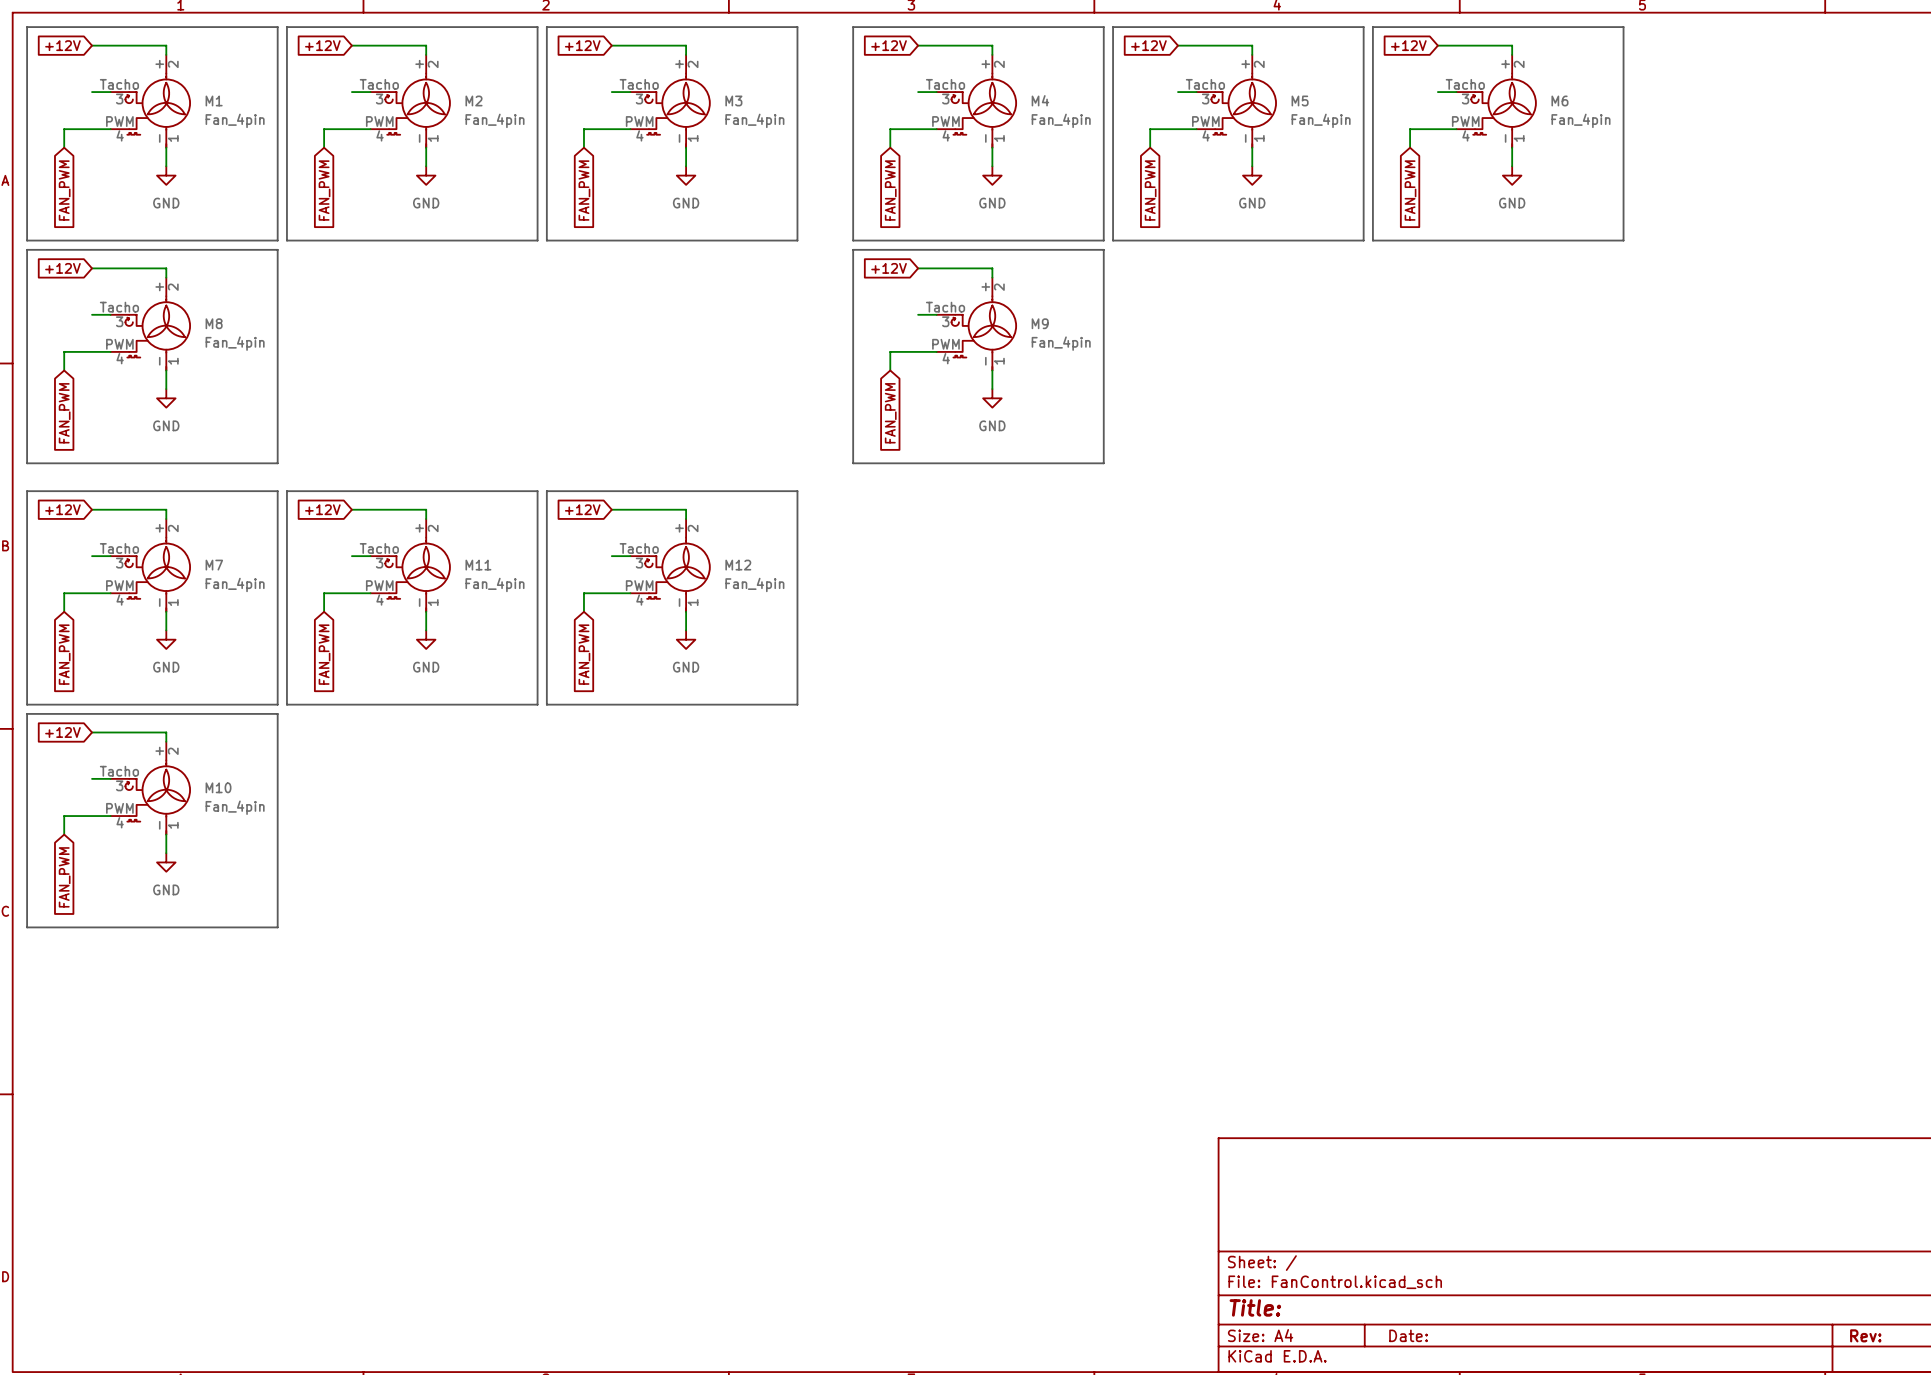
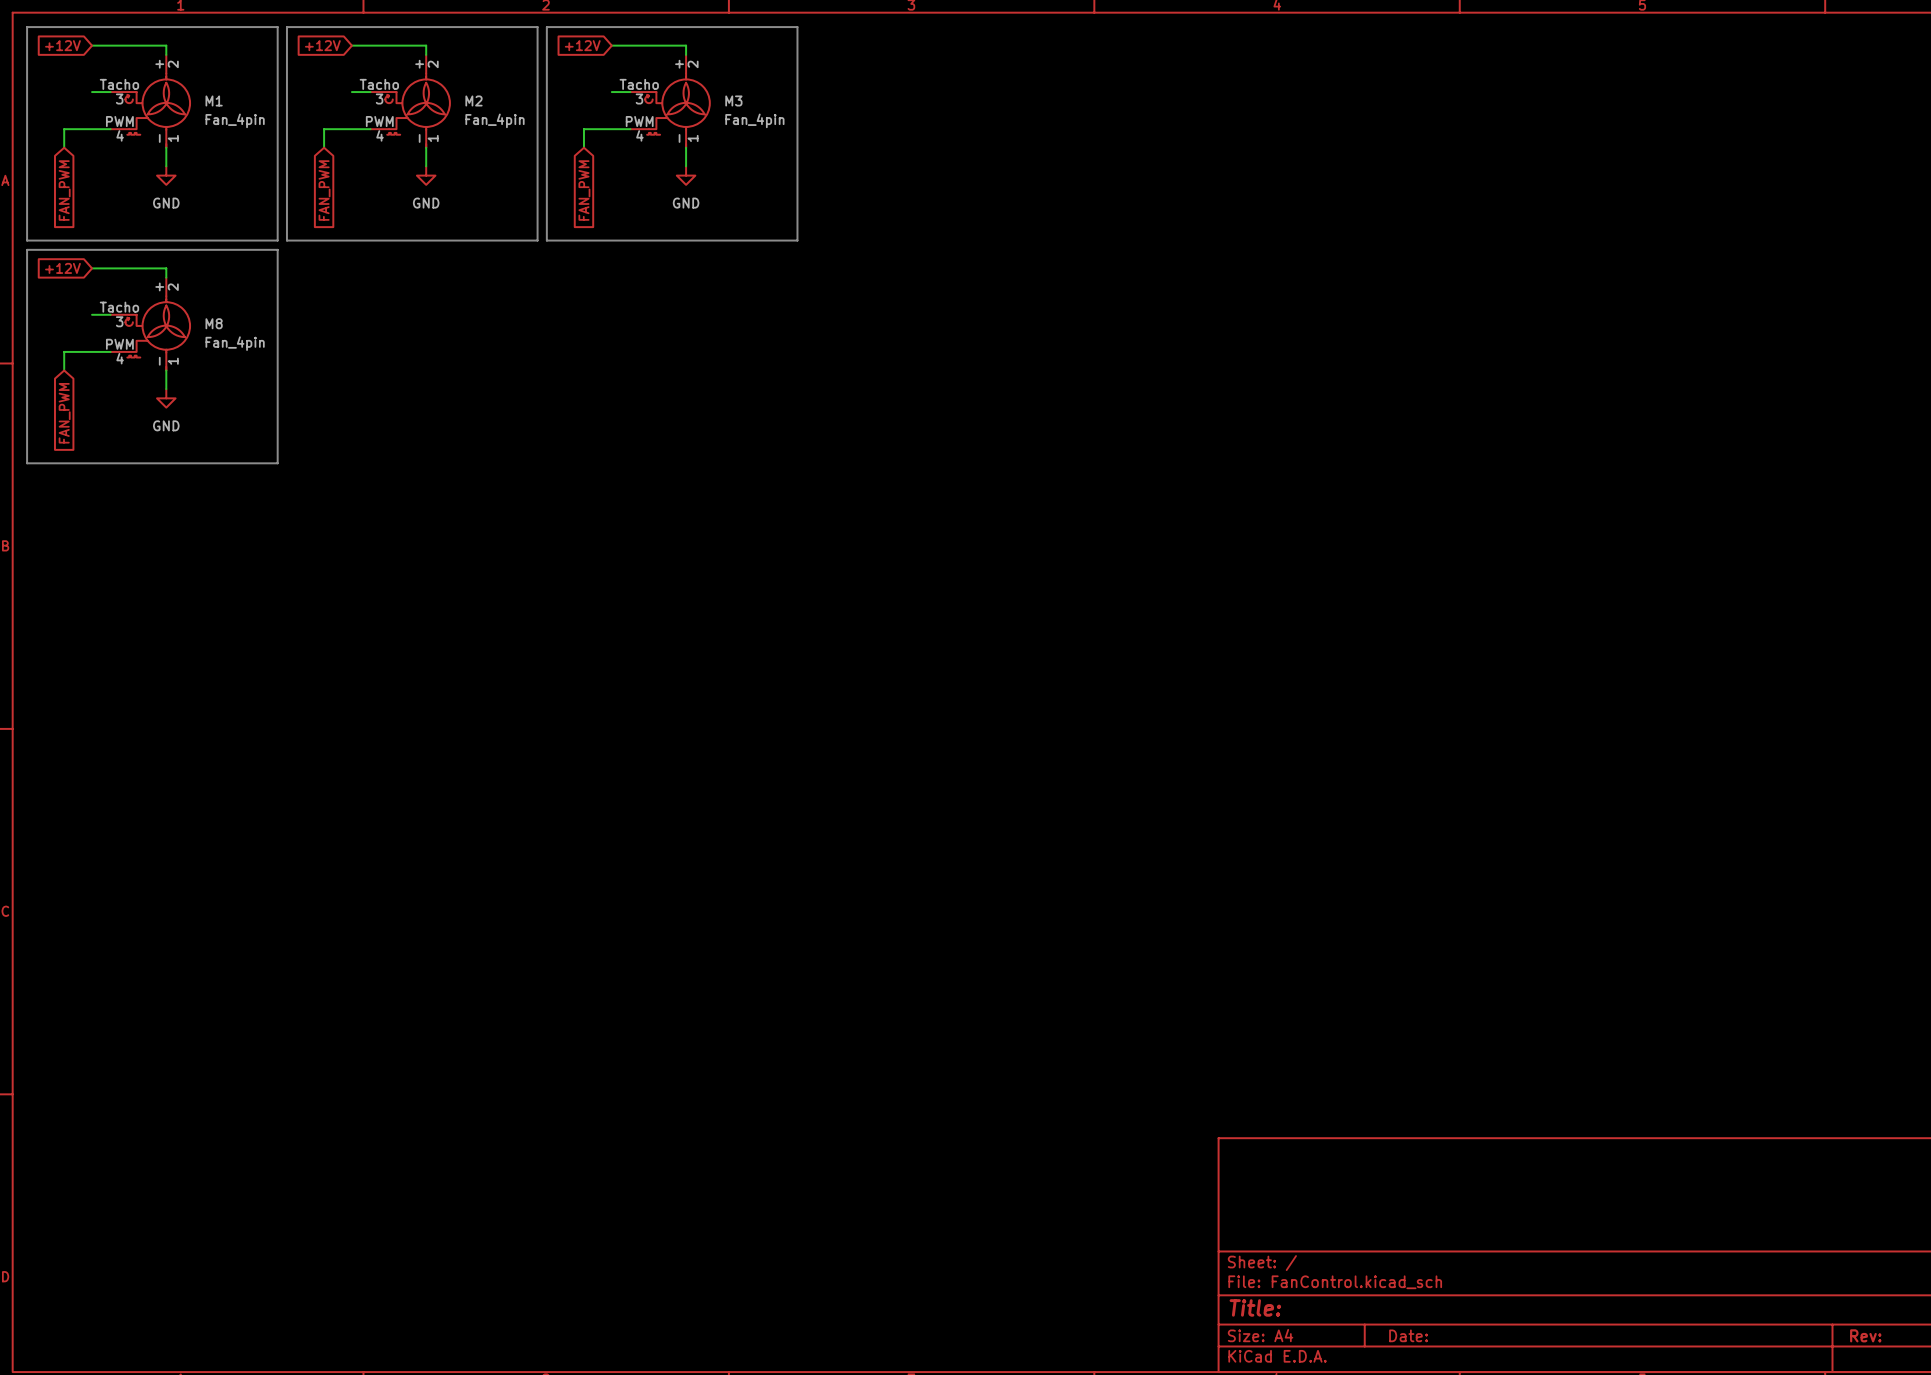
line: (853, 27) (1103, 27) (1103, 240) (853, 240) (853, 27) -> none
line: (1113, 27) (1363, 27) (1363, 240) (1113, 240) (1113, 27) -> none
line: (1372, 27) (1623, 27) (1623, 240) (1372, 240) (1372, 27) -> none
global label: +12V (889, 45) -> none
wire: (918, 45) (992, 45) (992, 54) -> none
global label: +12V (1148, 45) -> none
wire: (1178, 45) (1252, 45) (1252, 54) -> none
global label: +12V (1408, 45) -> none
wire: (1437, 45) (1512, 45) (1512, 54) -> none
wire: (918, 92) (936, 92) -> none
wire: (1178, 92) (1196, 92) -> none
wire: (1437, 92) (1456, 92) -> none
M4: Fan_4pin (976, 101) -> none
M5: Fan_4pin (1236, 101) -> none
M6: Fan_4pin (1496, 101) -> none
wire: (936, 129) (890, 129) (890, 147) -> none
wire: (1196, 129) (1150, 129) (1150, 147) -> none
wire: (1456, 129) (1410, 129) (1410, 147) -> none
wire: (992, 147) (992, 166) -> none
wire: (1252, 147) (1252, 166) -> none
wire: (1512, 147) (1512, 166) -> none
power symbol: GND (992, 175) -> none
power symbol: GND (1252, 175) -> none
power symbol: GND (1512, 175) -> none
global label: FAN_PWM (890, 190) -> none
global label: FAN_PWM (1150, 190) -> none
global label: FAN_PWM (1410, 190) -> none
line: (853, 249) (1103, 249) (1103, 463) (853, 463) (853, 249) -> none
global label: +12V (889, 268) -> none
wire: (918, 268) (992, 268) (992, 277) -> none
wire: (918, 314) (936, 314) -> none
M9: Fan_4pin (976, 324) -> none
wire: (936, 351) (890, 351) (890, 370) -> none
wire: (992, 370) (992, 389) -> none
power symbol: GND (992, 398) -> none
global label: FAN_PWM (890, 413) -> none
line: (27, 491) (27, 704) (277, 704) (277, 491) (27, 491) -> none
line: (286, 491) (537, 491) (537, 704) (286, 704) (286, 491) -> none
line: (546, 491) (797, 491) (797, 704) (546, 704) (546, 491) -> none
global label: +12V (62, 509) -> none
wire: (92, 509) (166, 509) (166, 519) -> none
global label: +12V (322, 509) -> none
wire: (351, 509) (426, 509) (426, 519) -> none
global label: +12V (582, 509) -> none
wire: (611, 509) (686, 509) (686, 519) -> none
wire: (92, 556) (110, 556) -> none
wire: (351, 556) (370, 556) -> none
wire: (611, 556) (630, 556) -> none
M7: Fan_4pin (150, 565) -> none
M11: Fan_4pin (410, 565) -> none
M12: Fan_4pin (670, 565) -> none
wire: (110, 593) (64, 593) (64, 611) -> none
wire: (370, 593) (324, 593) (324, 611) -> none
wire: (630, 593) (583, 593) (583, 611) -> none
wire: (166, 611) (166, 630) -> none
wire: (426, 611) (426, 630) -> none
wire: (686, 611) (686, 630) -> none
power symbol: GND (166, 639) -> none
power symbol: GND (426, 639) -> none
power symbol: GND (686, 639) -> none
global label: FAN_PWM (64, 654) -> none
global label: FAN_PWM (324, 654) -> none
global label: FAN_PWM (584, 654) -> none
line: (27, 713) (27, 927) (277, 927) (277, 713) (27, 713) -> none
global label: +12V (62, 732) -> none
wire: (92, 732) (166, 732) (166, 741) -> none
wire: (92, 778) (110, 778) -> none
M10: Fan_4pin (150, 788) -> none
wire: (110, 816) (64, 816) (64, 834) -> none
wire: (166, 834) (166, 853) -> none
power symbol: GND (166, 862) -> none
global label: FAN_PWM (64, 877) -> none

